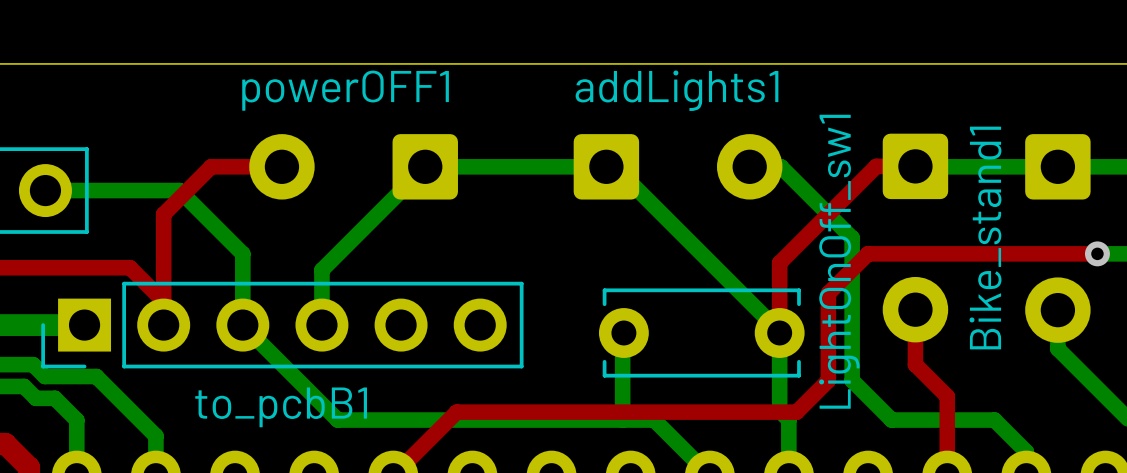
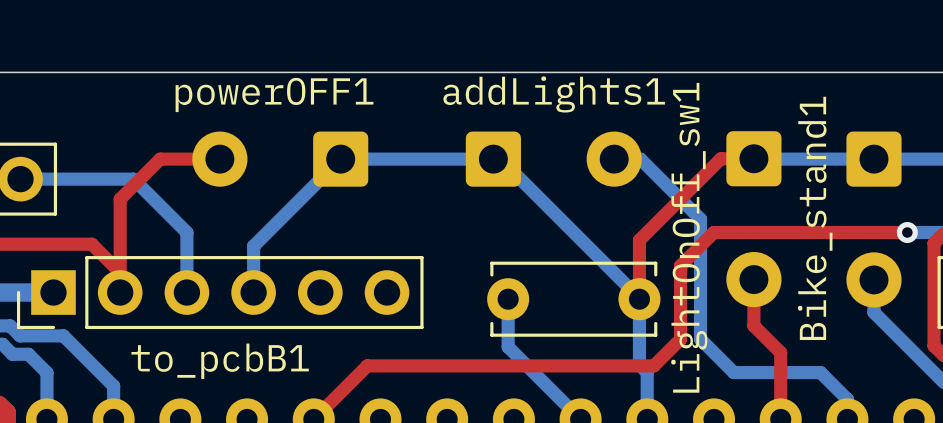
bottom track: (242, 325) (337, 420) (654, 420) -> (508, 299) (508, 346) (533, 372)
bottom track: (622, 334) (622, 420) -> none

